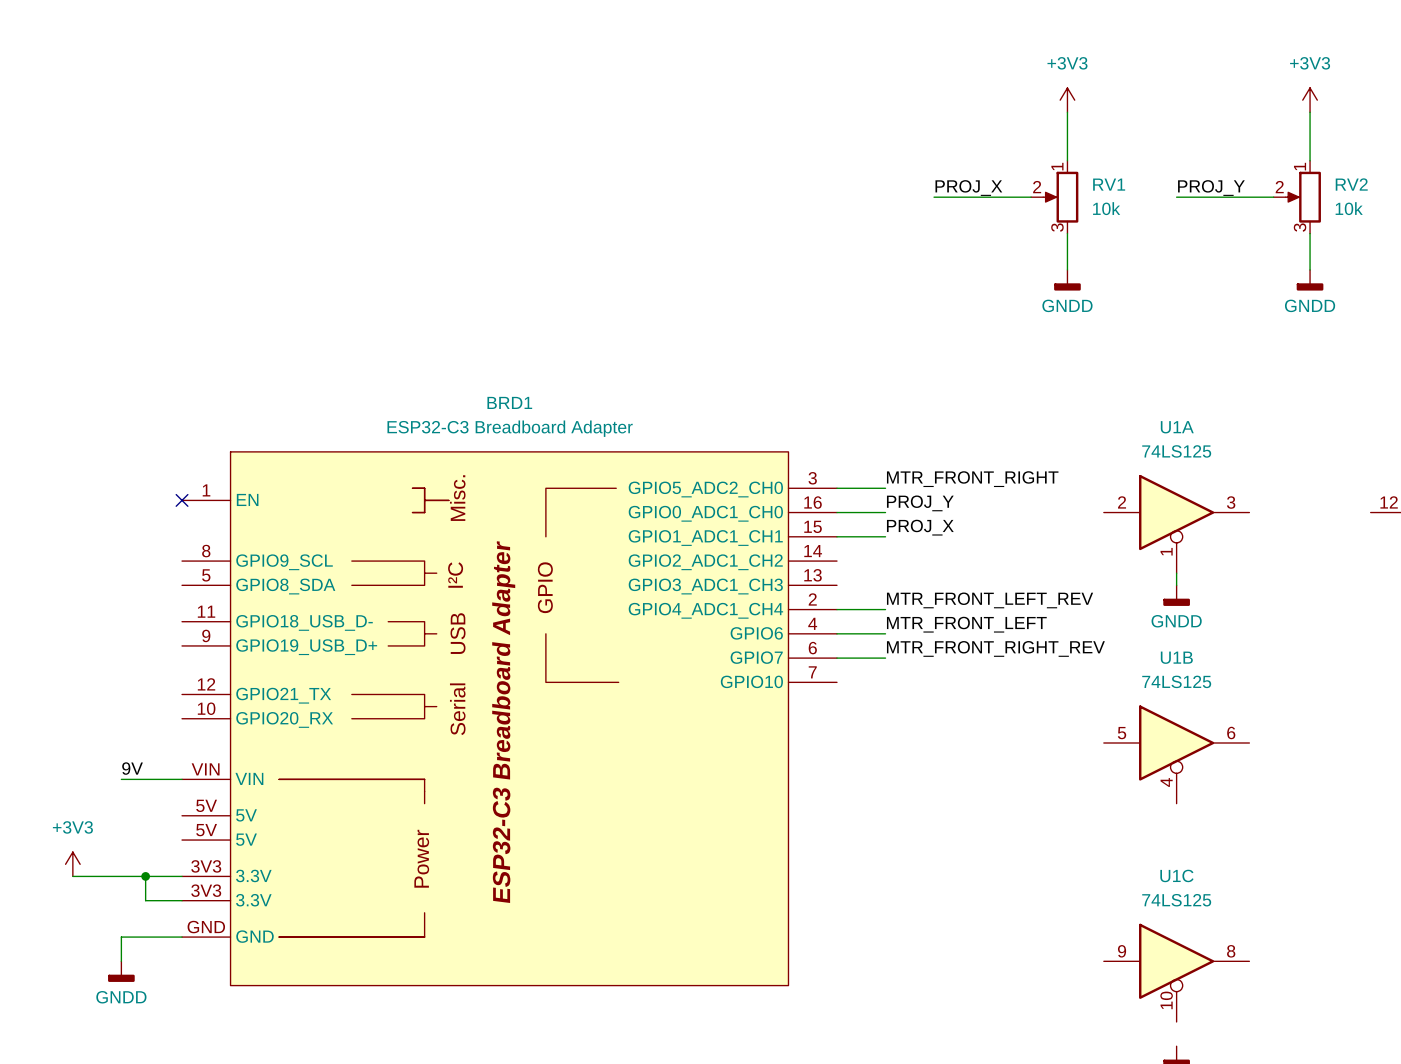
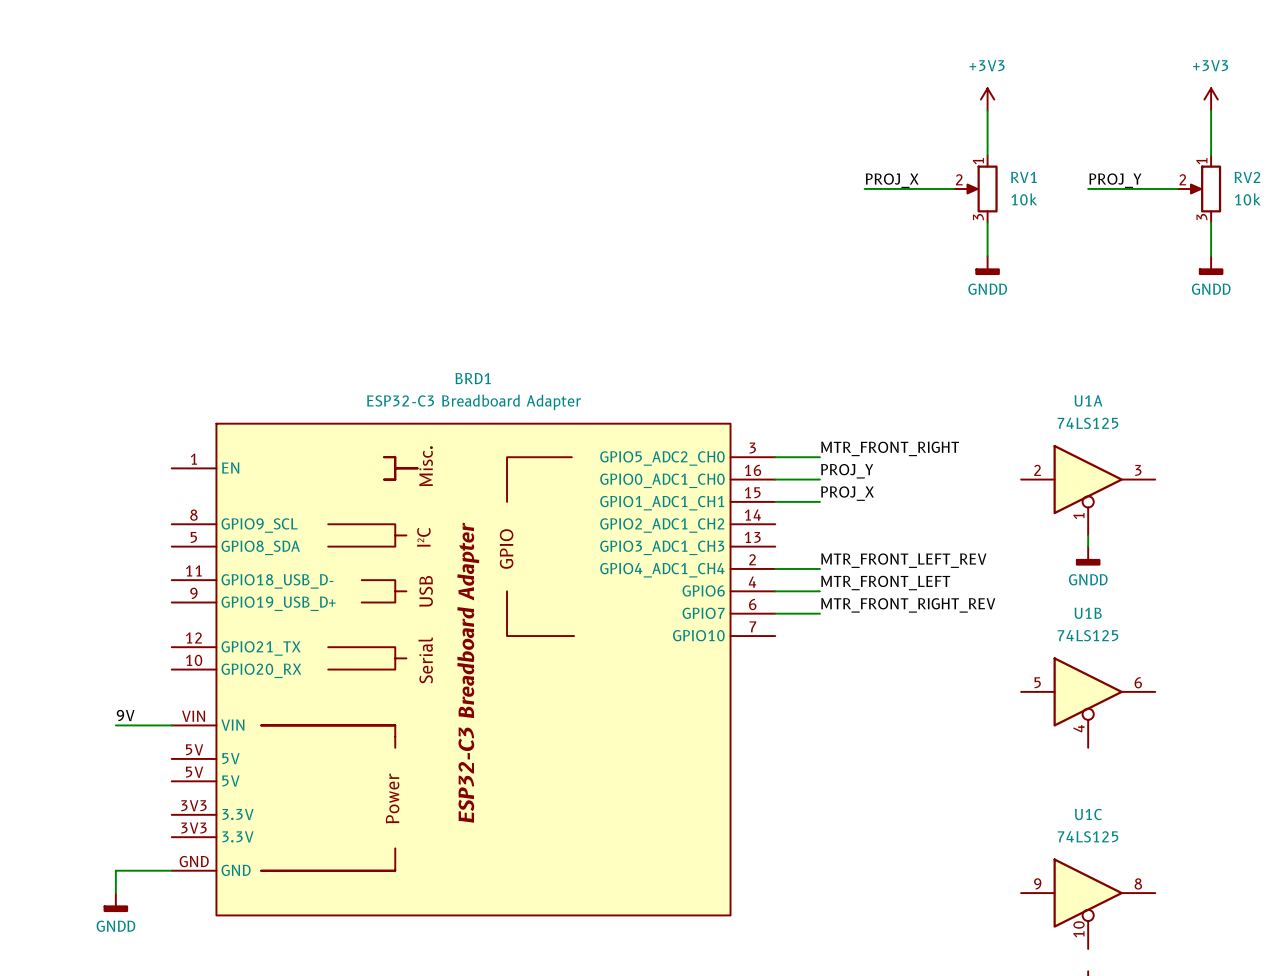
no-connect mark: (182, 500) -> none
power symbol: +3V3 (72, 864) -> none
wire: (72, 876) (182, 876) -> none
wire: (145, 876) (145, 900) (182, 900) -> none
junction: (145, 876) -> none

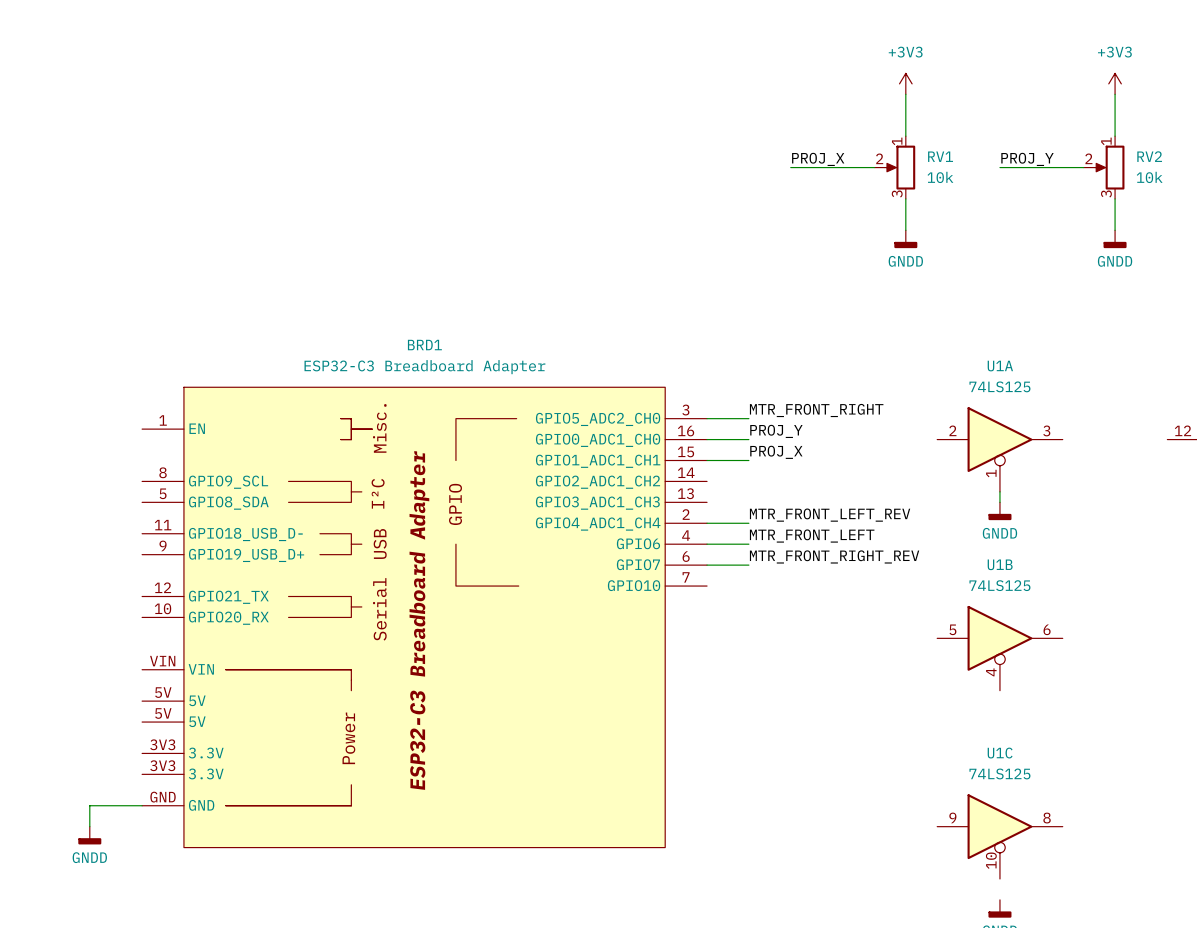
label: 9V (125, 715) -> none
wire: (115, 725) (171, 725) -> none

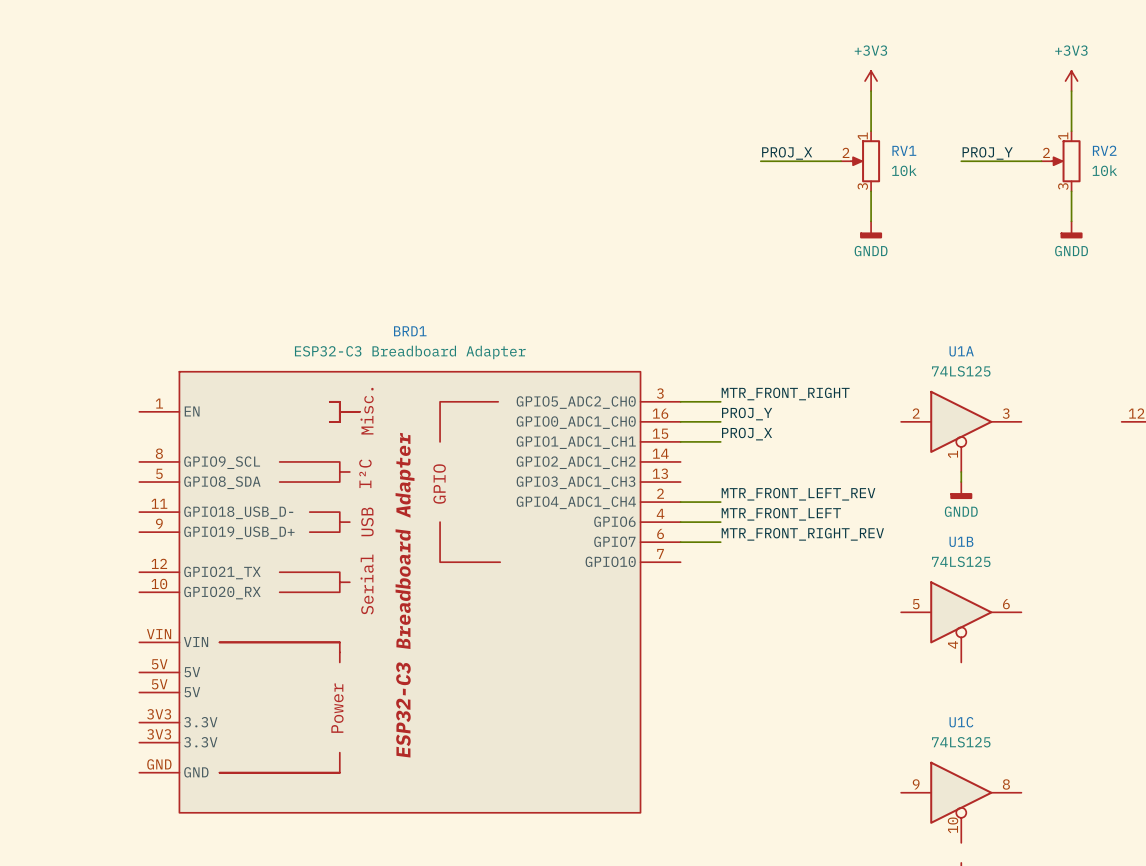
wire: (142, 805) (89, 805) (89, 826) -> none
power symbol: GNDD (89, 835) -> none

